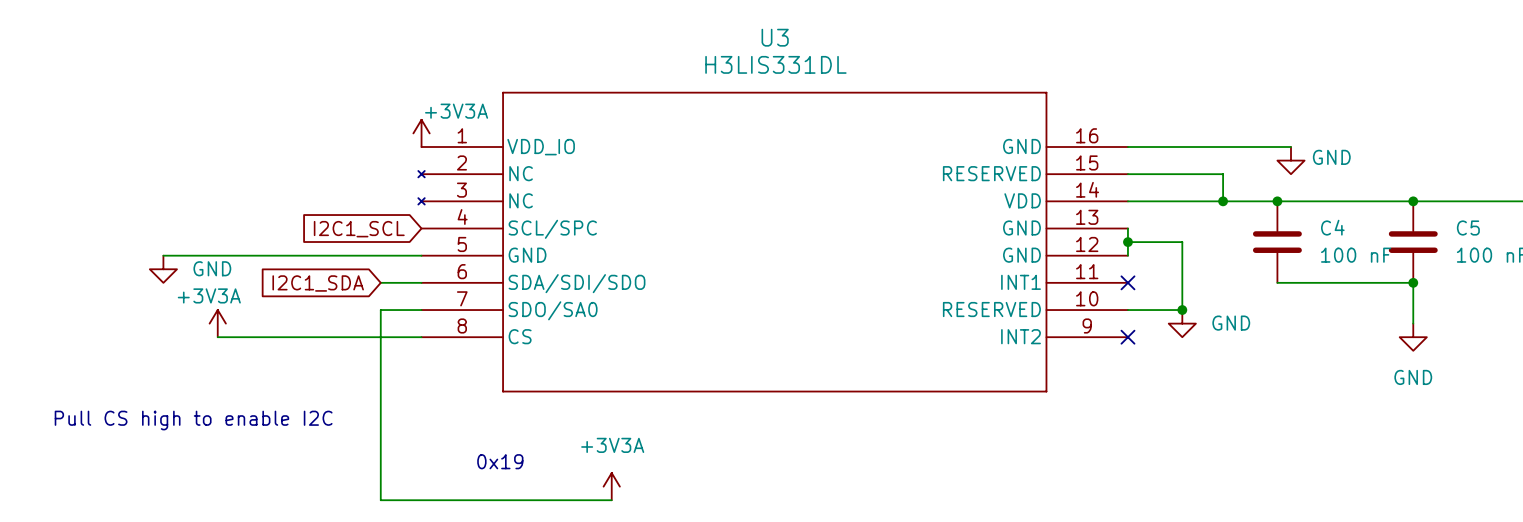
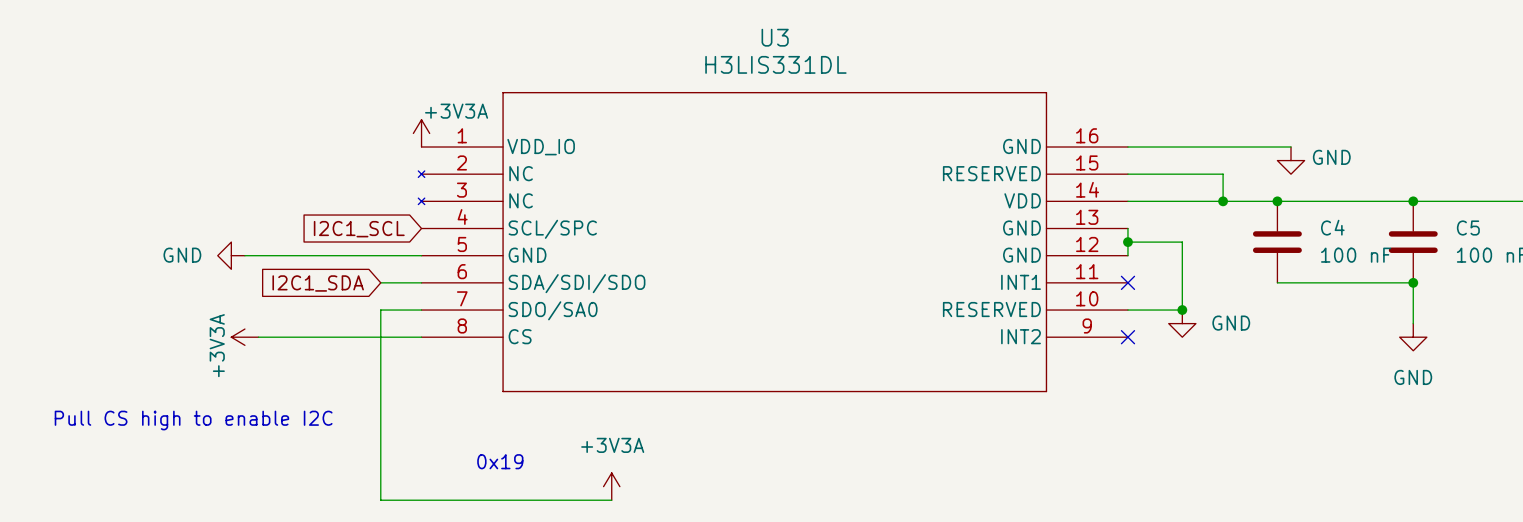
wire: (163, 255) (244, 255) -> none
power symbol text position: GND (212, 268) -> GND (182, 255)
power symbol rotation: 0° (163, 269) -> 90° clockwise (231, 255)
power symbol position: GND (163, 269) -> GND (231, 255)
power symbol rotation: 0° (217, 323) -> 90° counterclockwise (244, 337)
power symbol position: +3V3A (217, 323) -> +3V3A (244, 337)

